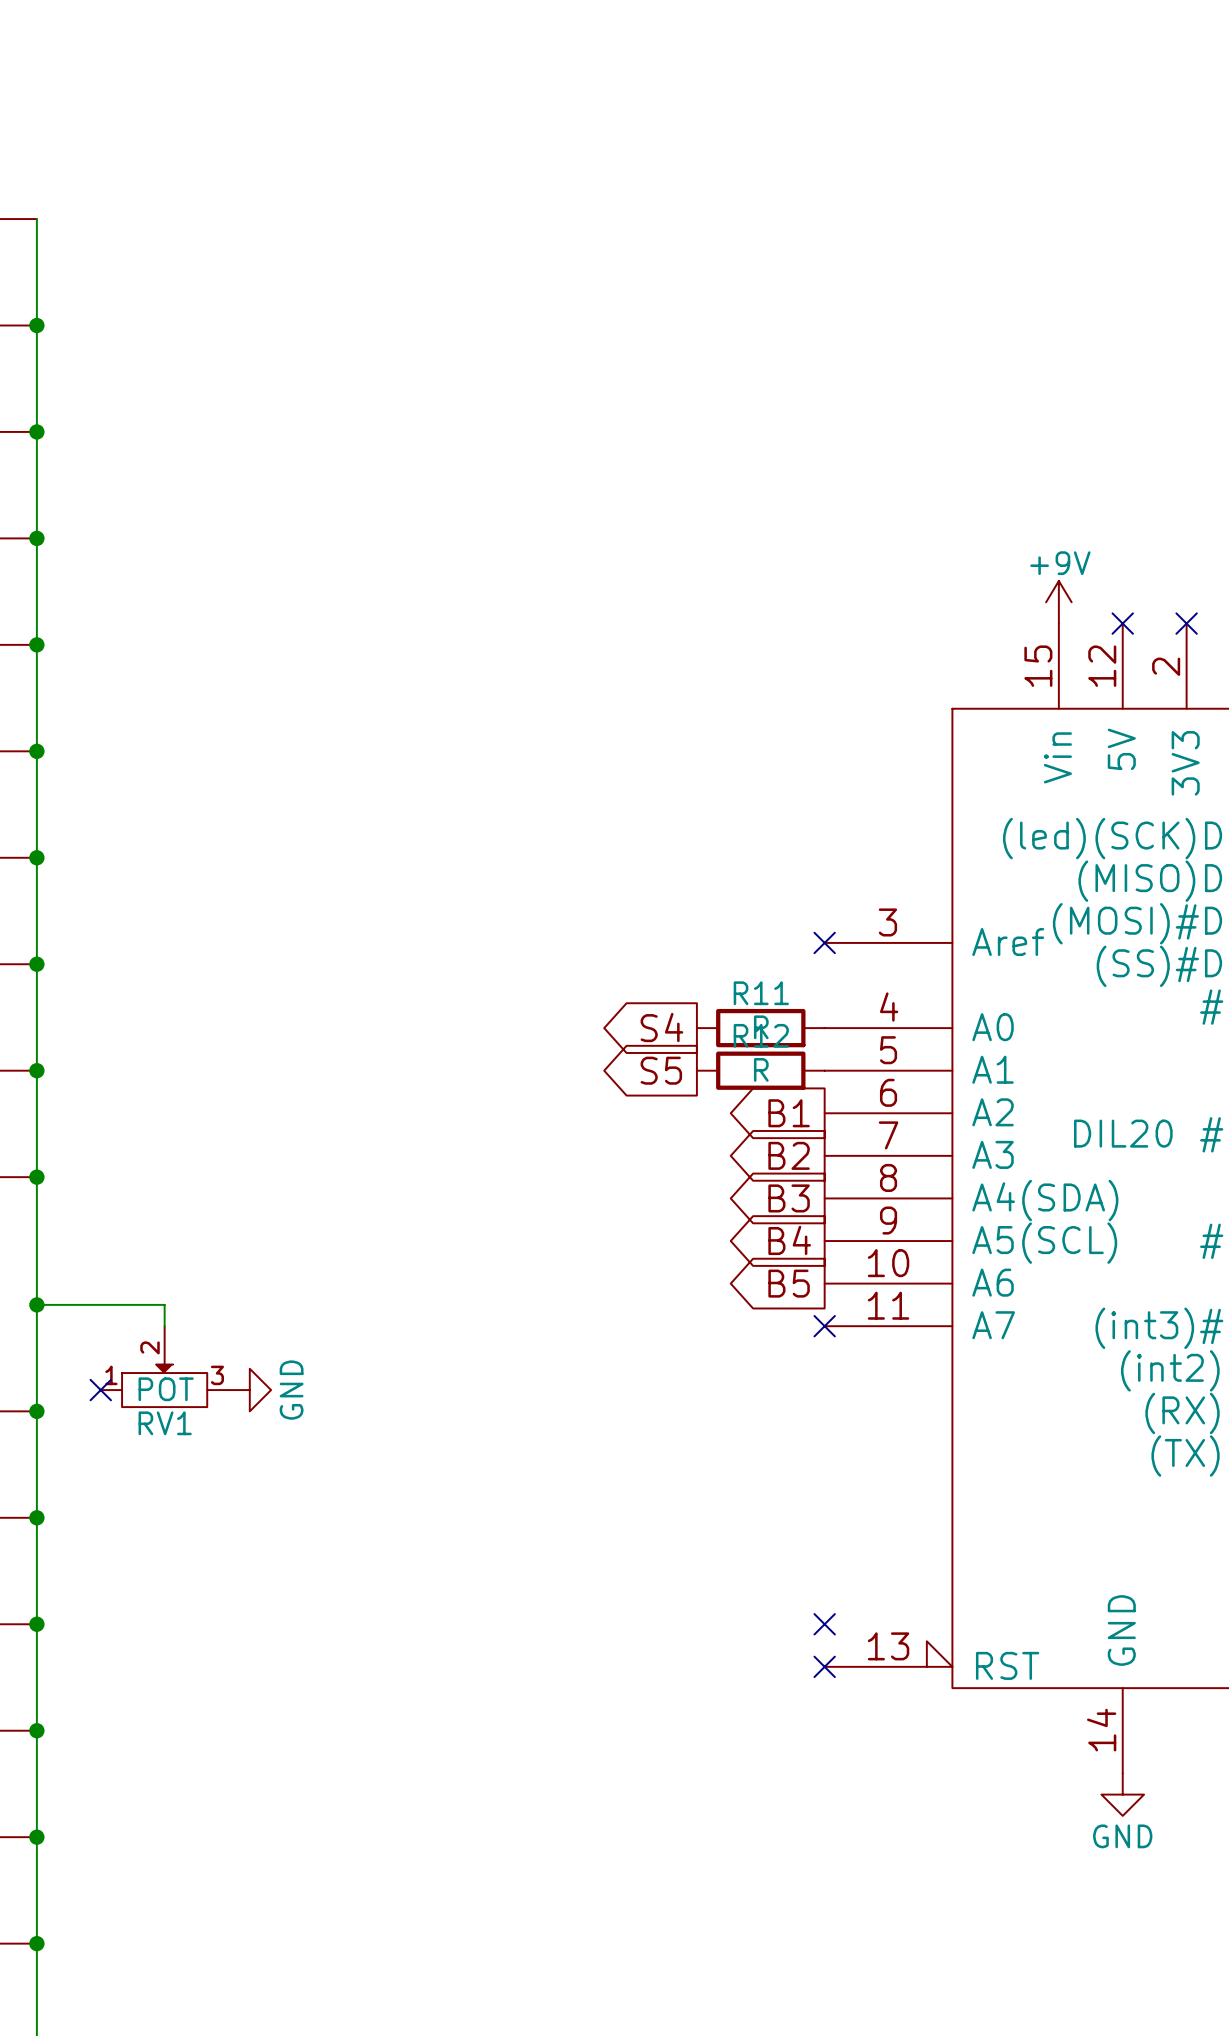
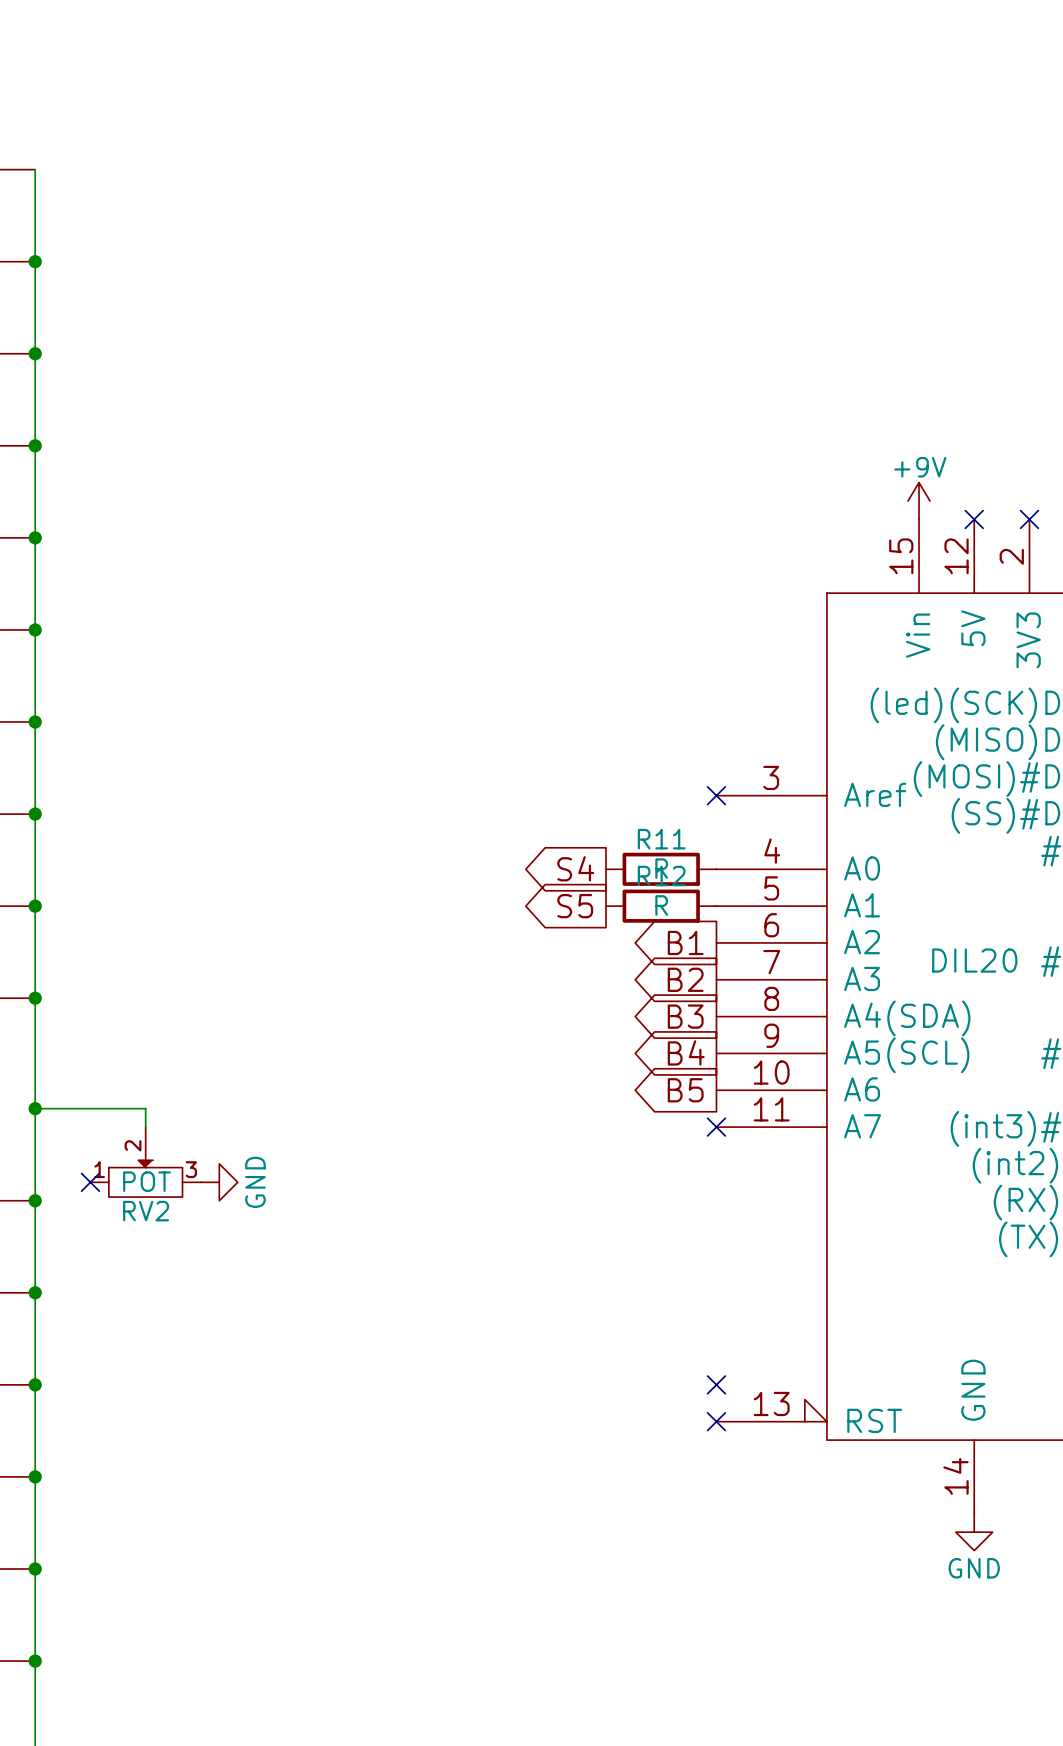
RV1 name: RV1 (165, 1423) -> RV2 (146, 1211)

